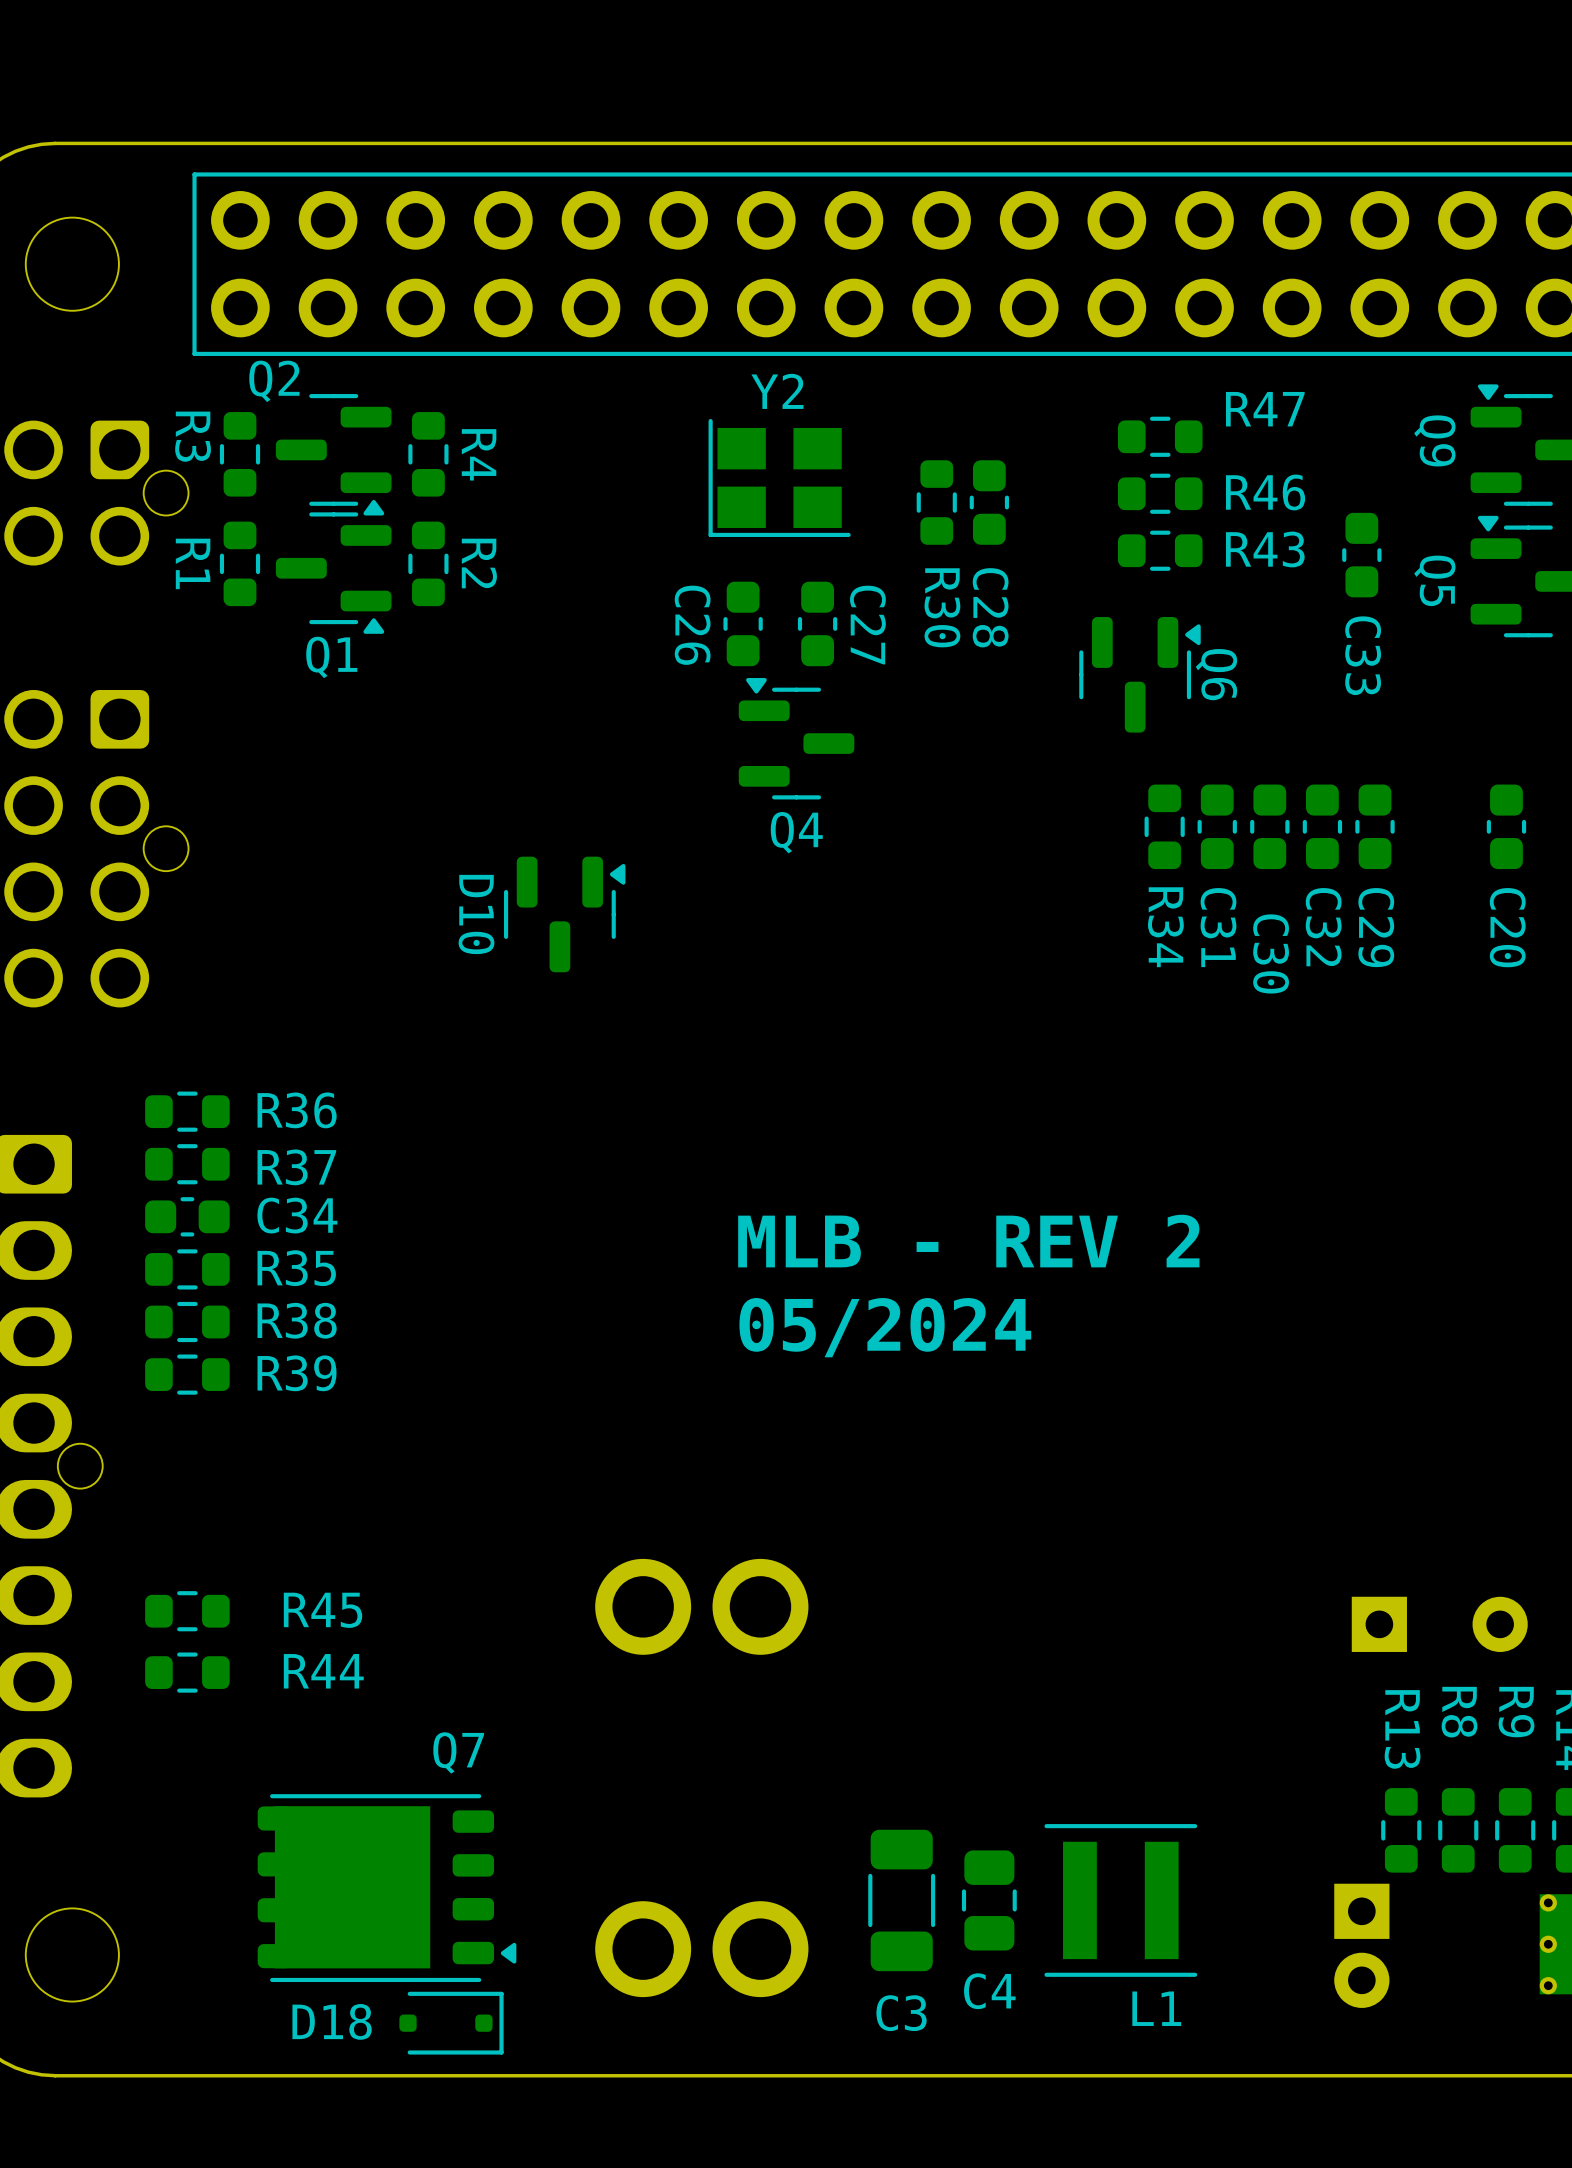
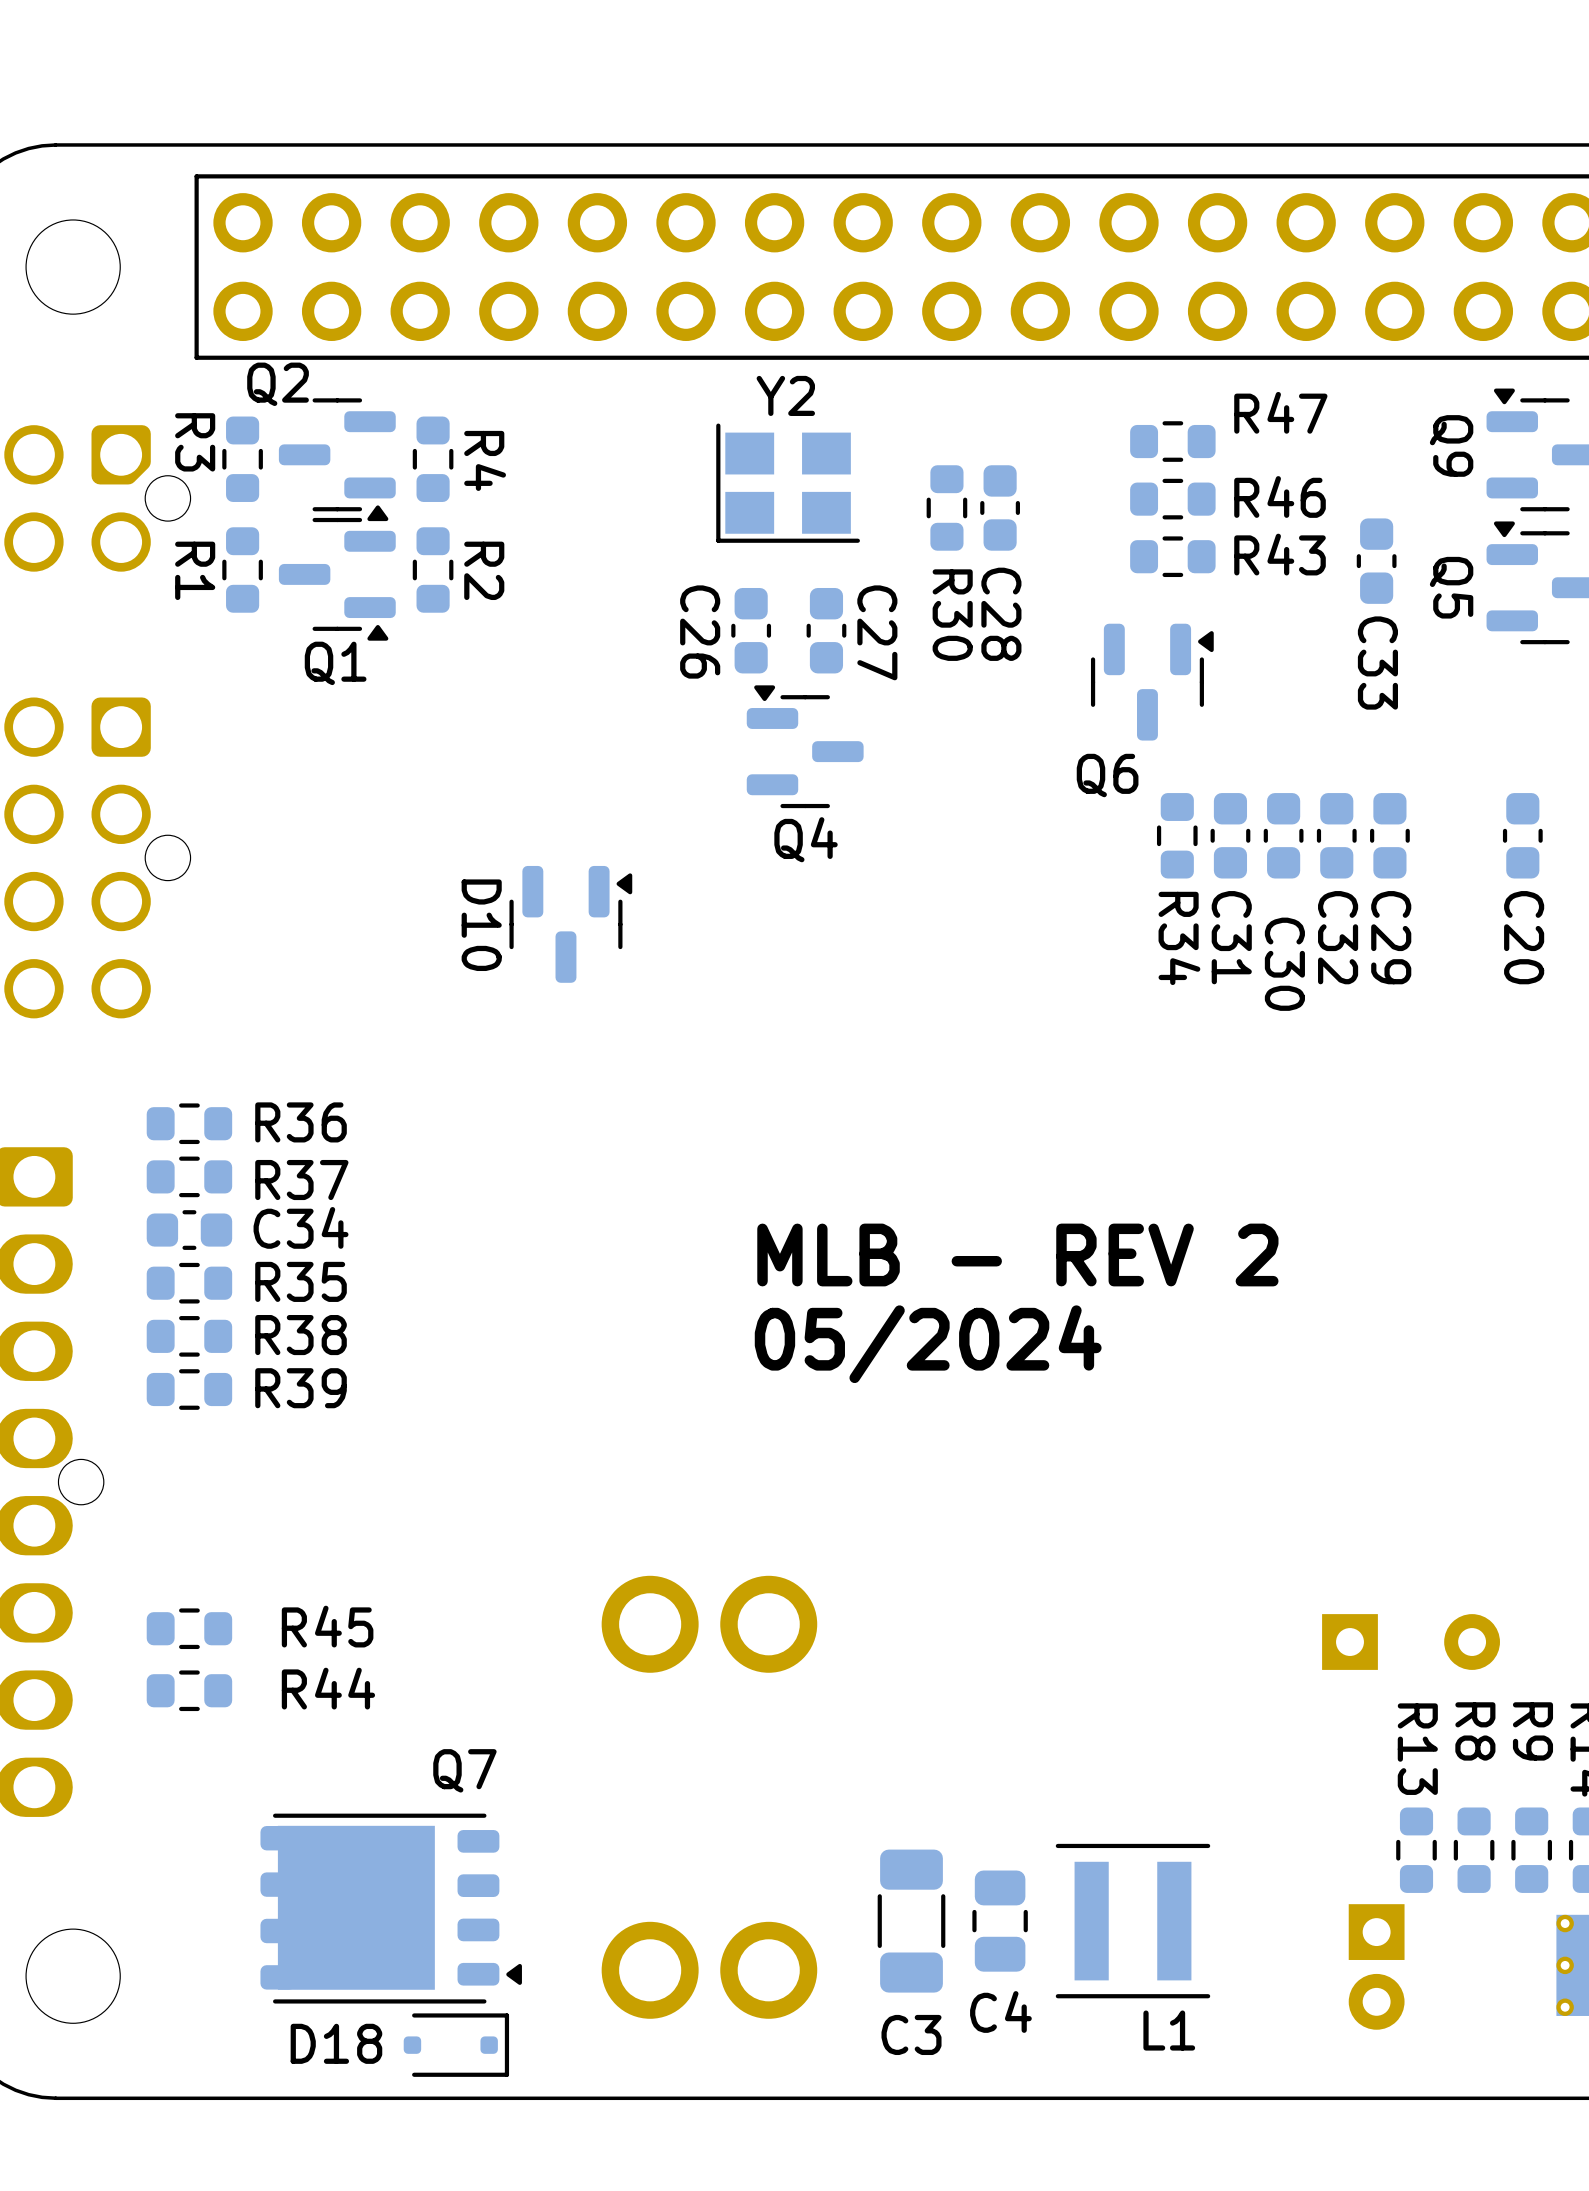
Q6 name rotation: 0° (1216, 674) -> 90° counterclockwise (1107, 775)
Q6 name position: Q6 (1216, 674) -> Q6 (1107, 775)
part position: (1439, 1624) -> (1411, 1642)

